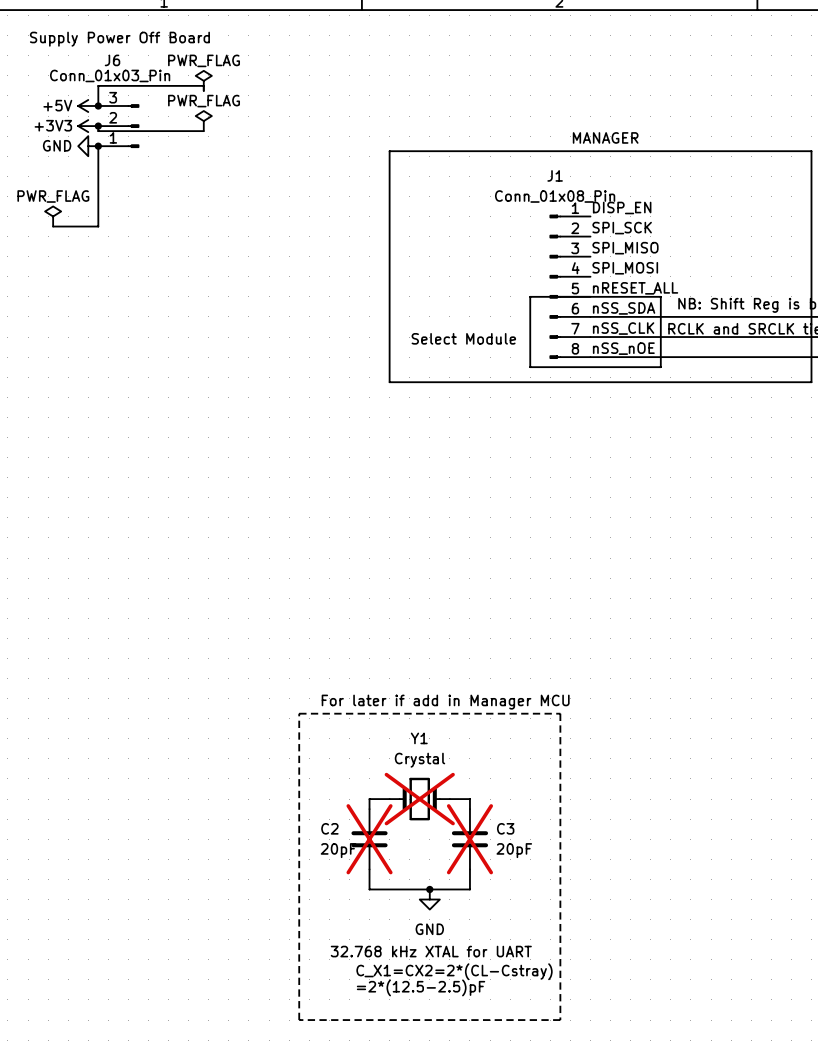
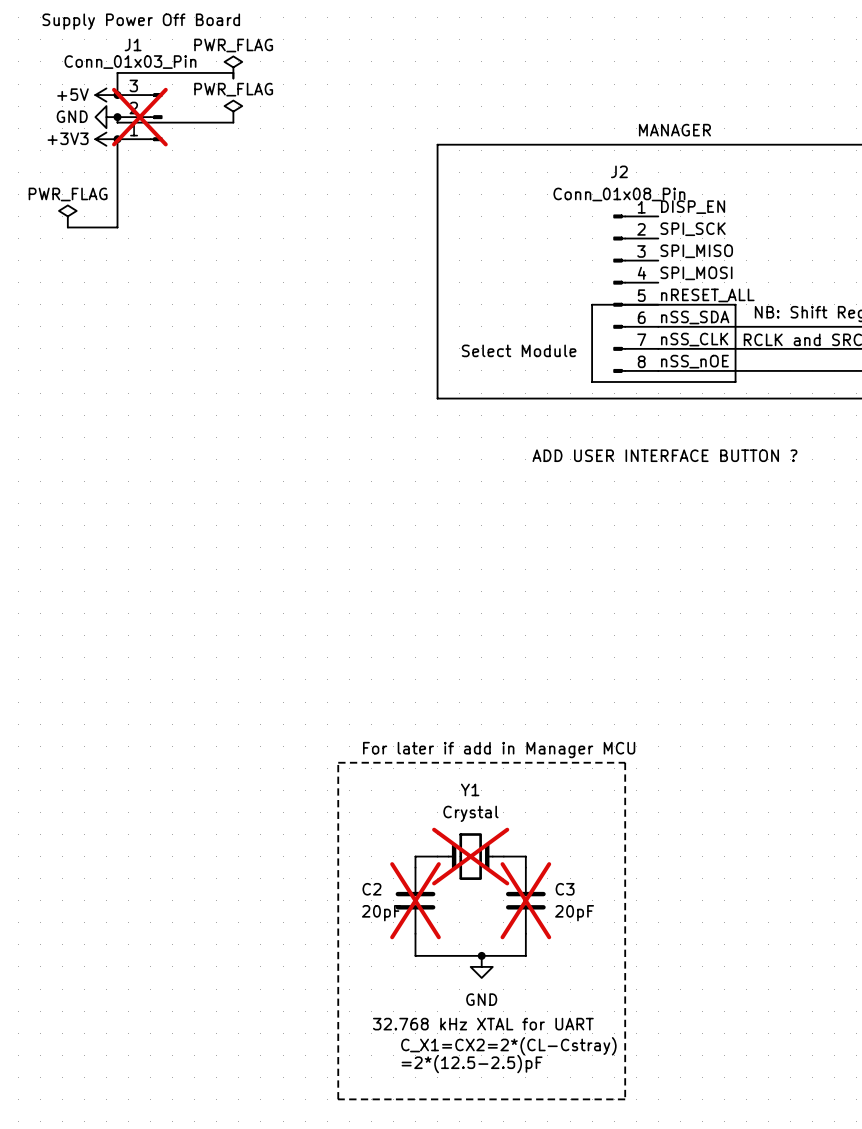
J6 name: J6 (112, 60) -> J1 (133, 44)
power symbol: +3V3 (88, 126) -> GND (106, 117)
J6 do-not-place cross: none -> (139, 117)
power symbol: GND (88, 146) -> +3V3 (106, 139)
J1 name: J1 (555, 175) -> J2 (619, 171)
text: none -> ADD USER INTERFACE BUTTON ? (664, 455)

